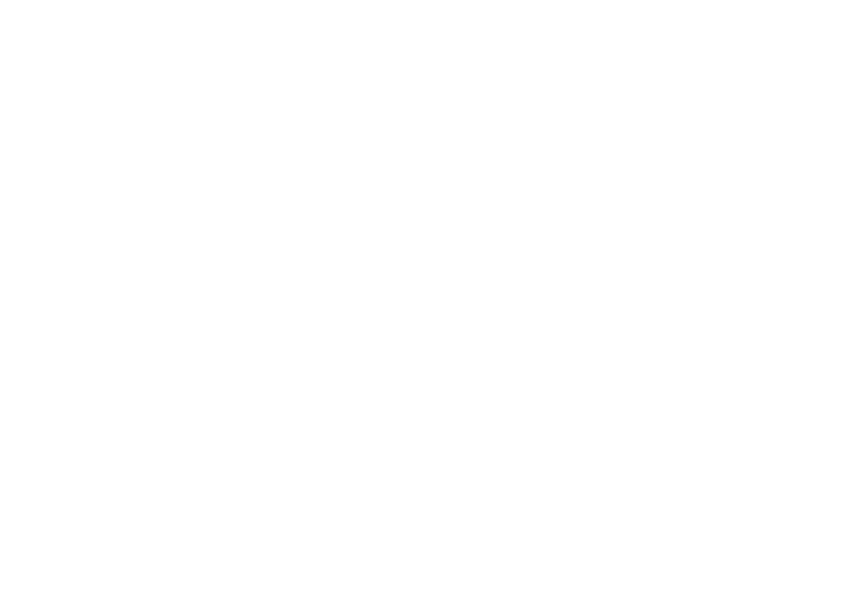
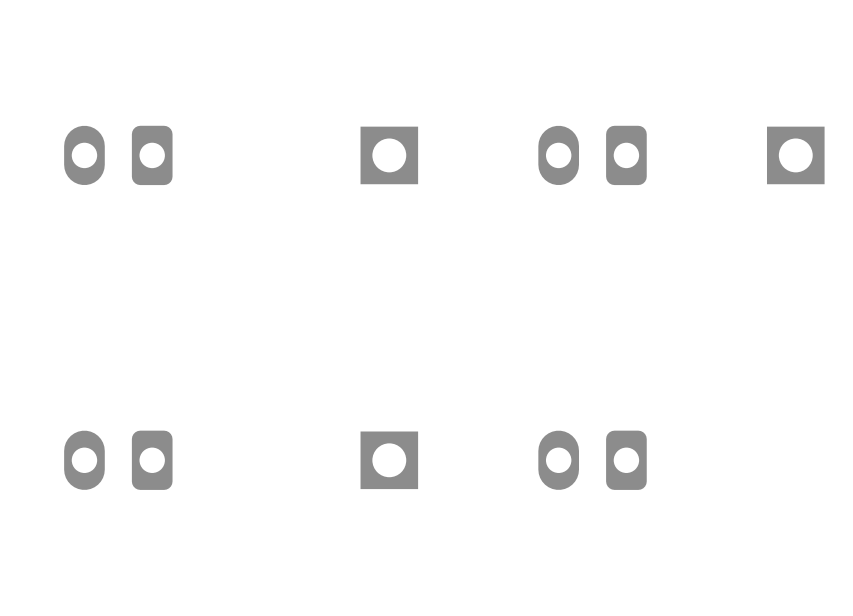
part: none -> (118, 155)
part: none -> (389, 155)
part: none -> (592, 155)
part: none -> (795, 155)
part: none -> (118, 460)
part: none -> (389, 460)
part: none -> (592, 460)

